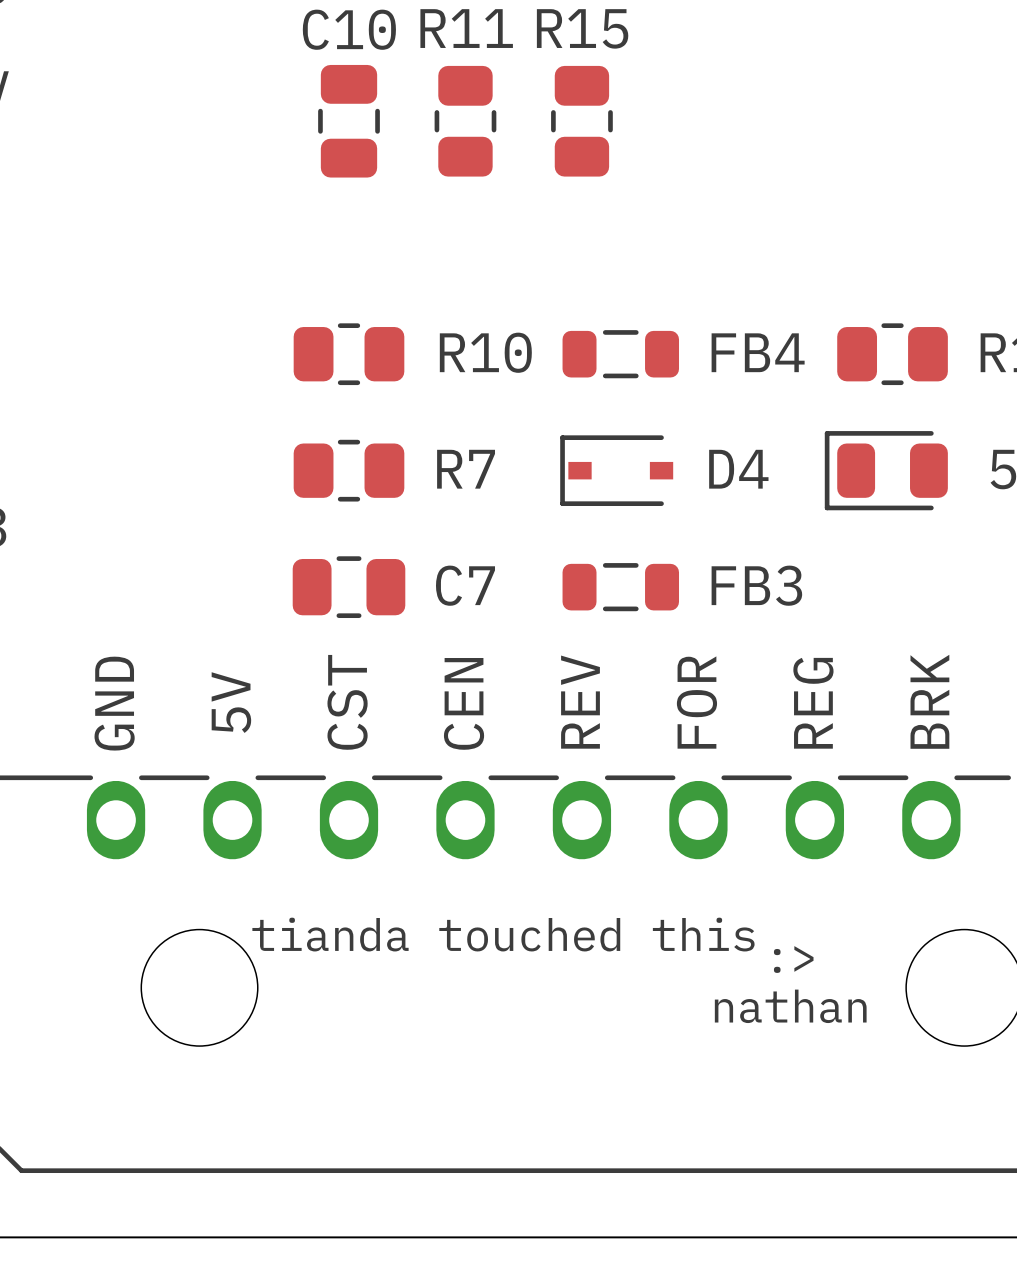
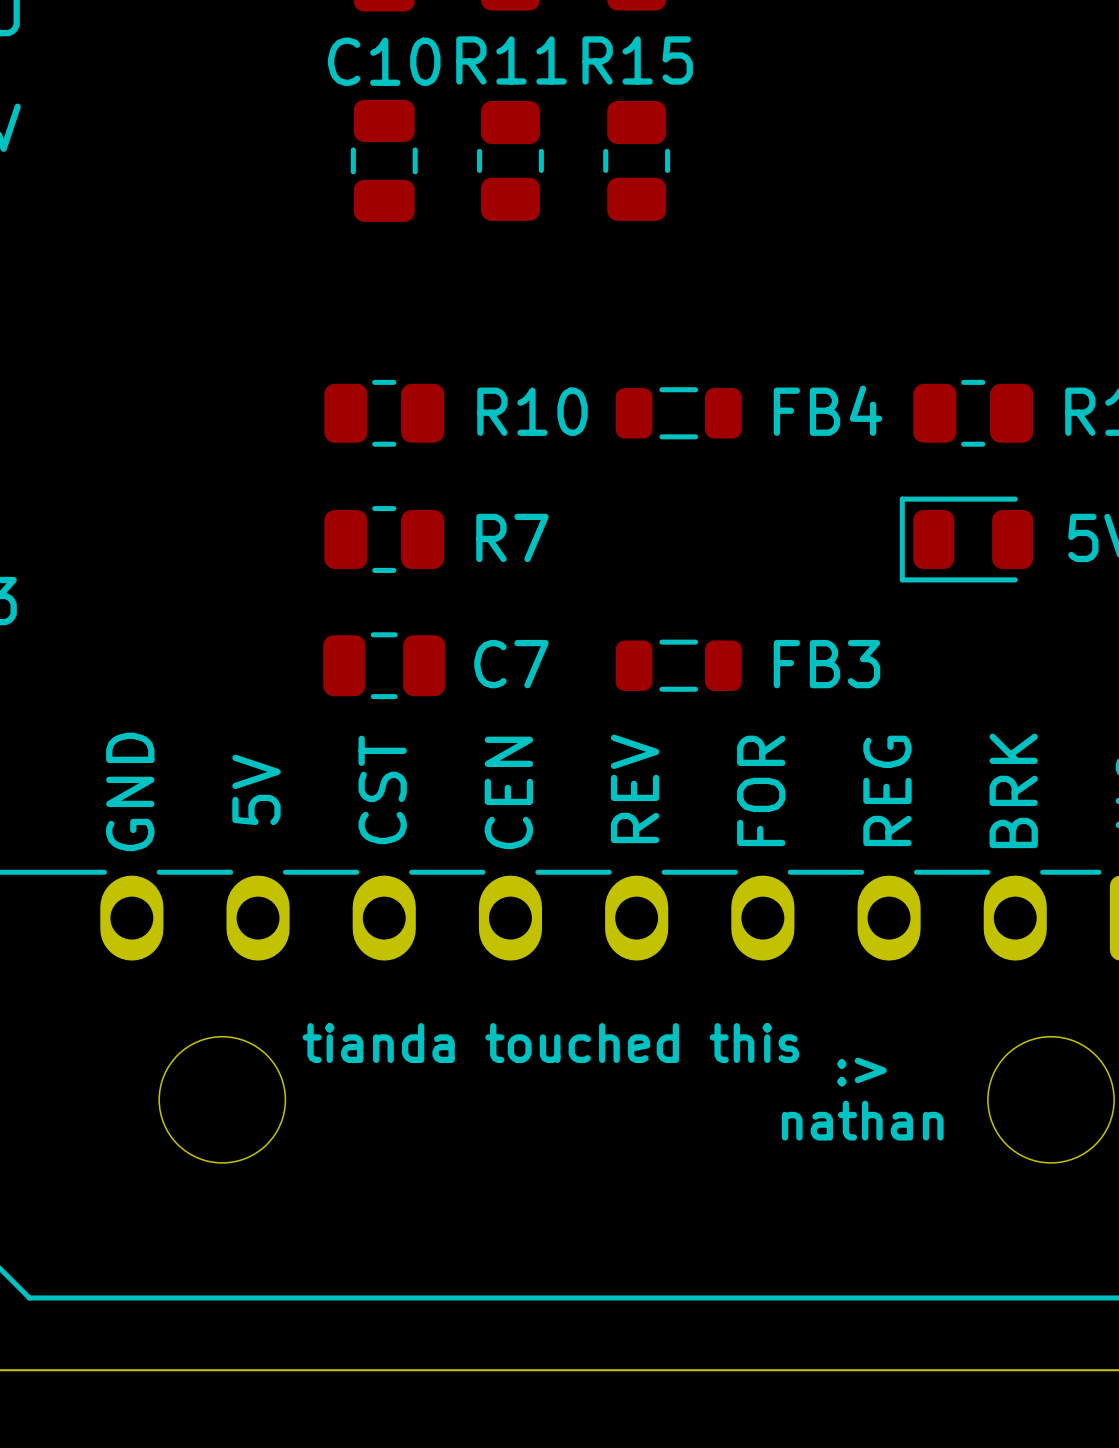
D4: (616, 470) -> none

